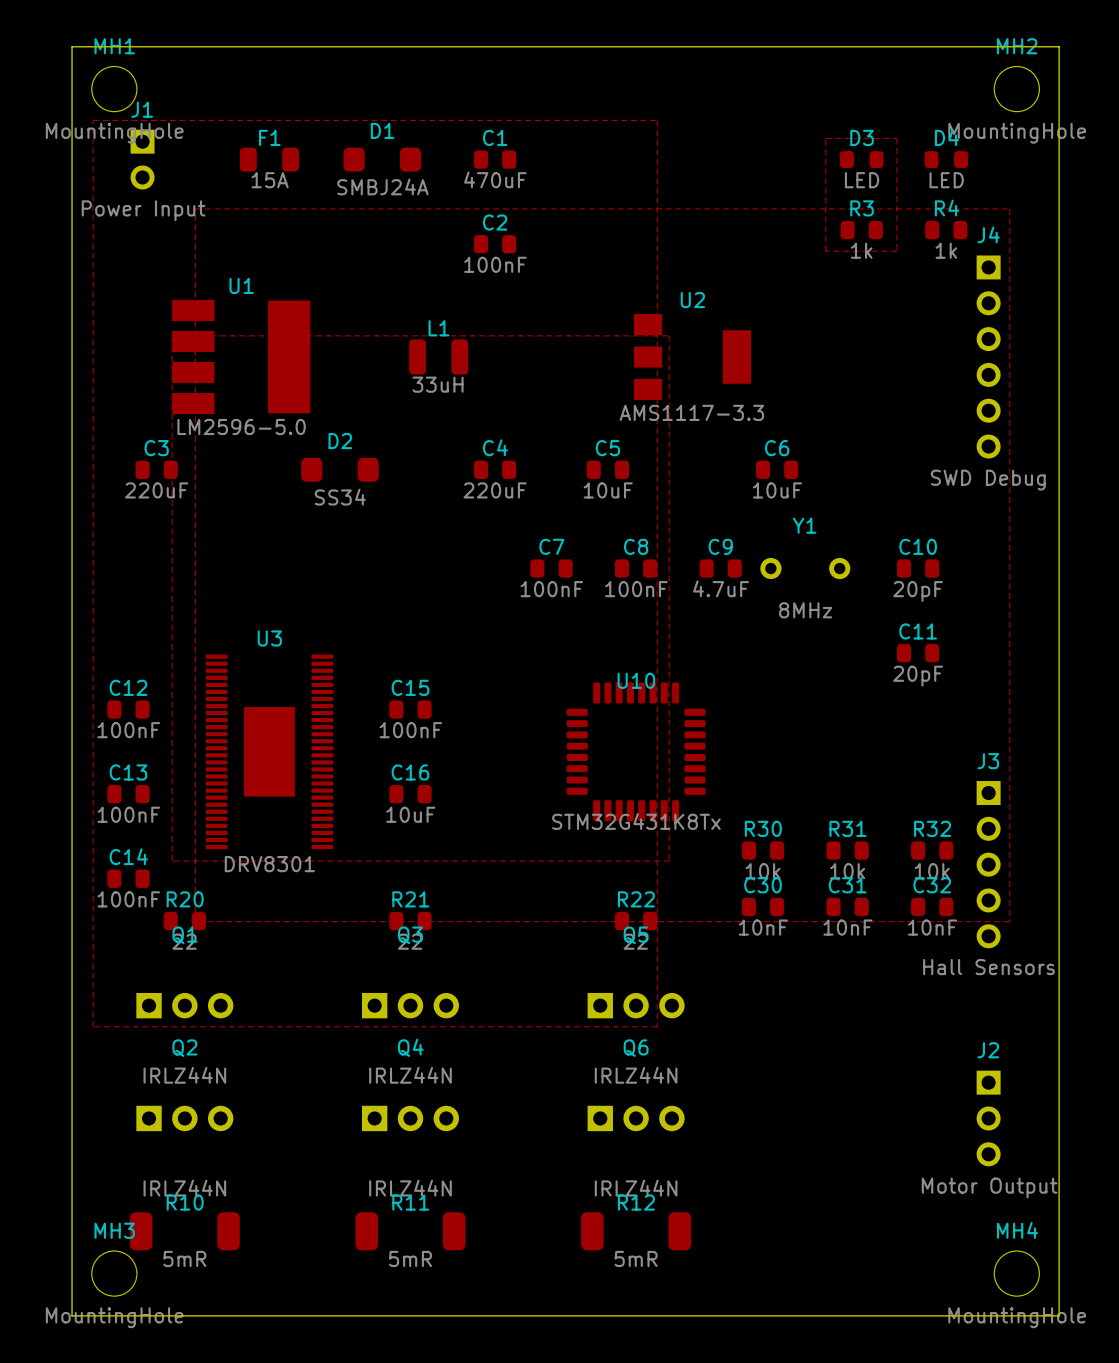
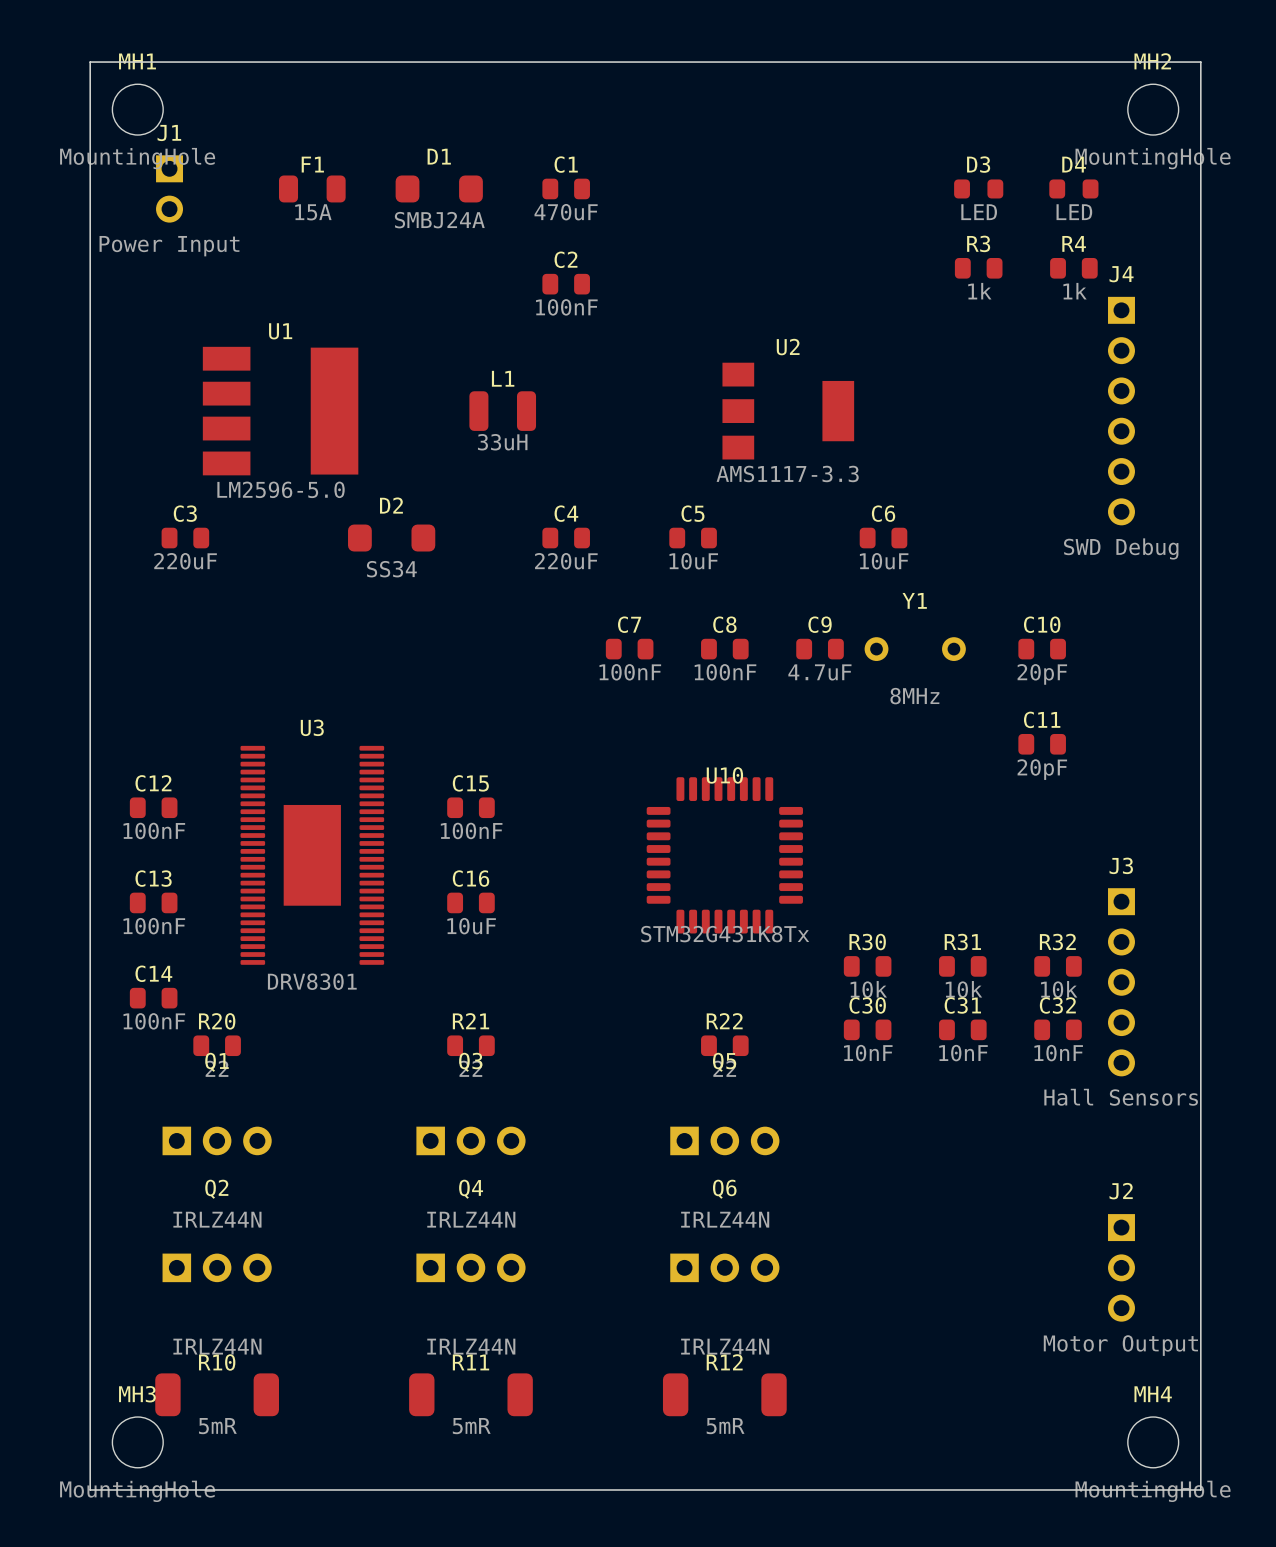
zone outline: (93, 120) (657, 120) (657, 1026) (93, 1026) (93, 120) -> none
zone outline: (825, 138) (896, 138) (896, 251) (825, 251) (825, 138) -> none
zone outline: (195, 208) (1009, 208) (1009, 921) (195, 921) (195, 208) -> none
zone outline: (172, 335) (669, 335) (669, 861) (172, 861) (172, 335) -> none

